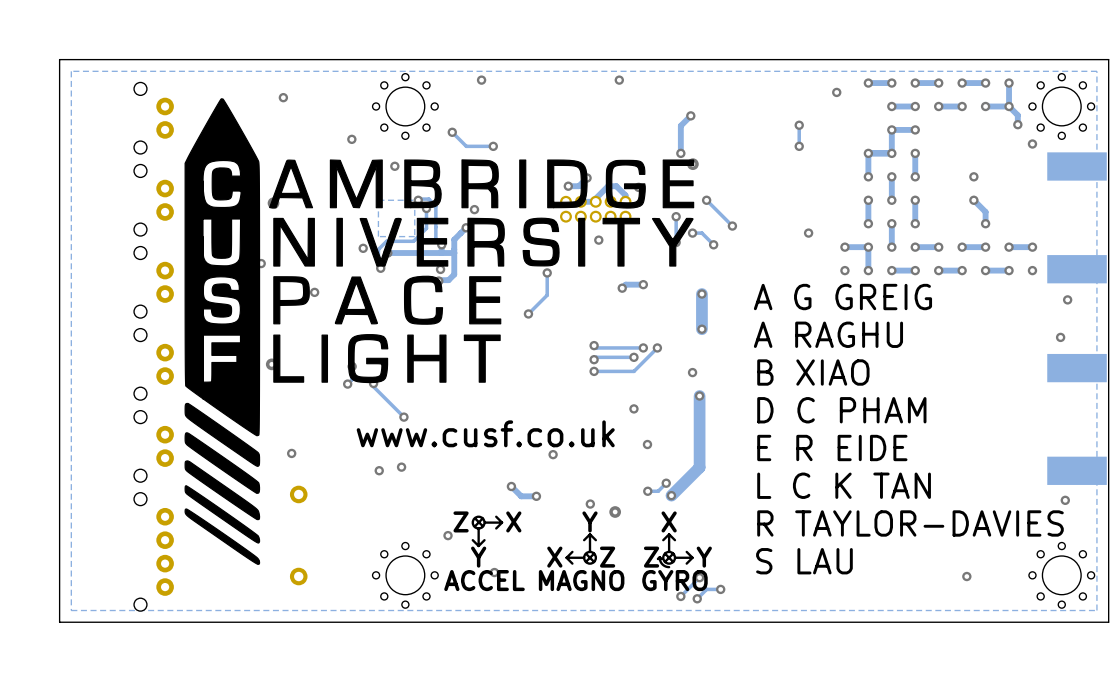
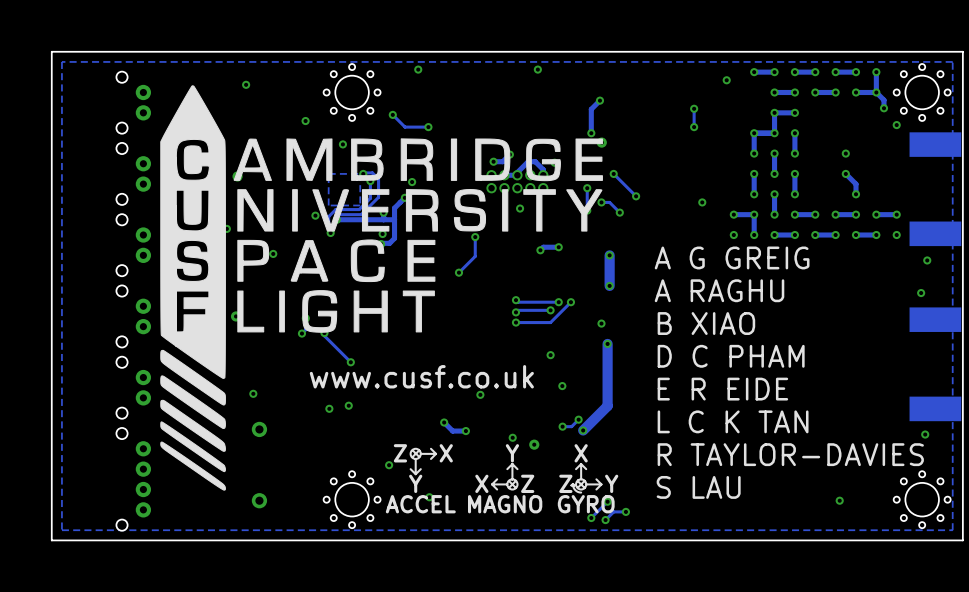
track: (435, 227) (435, 238) (441, 244) -> (378, 197) (361, 214) (337, 214) (336, 219)

